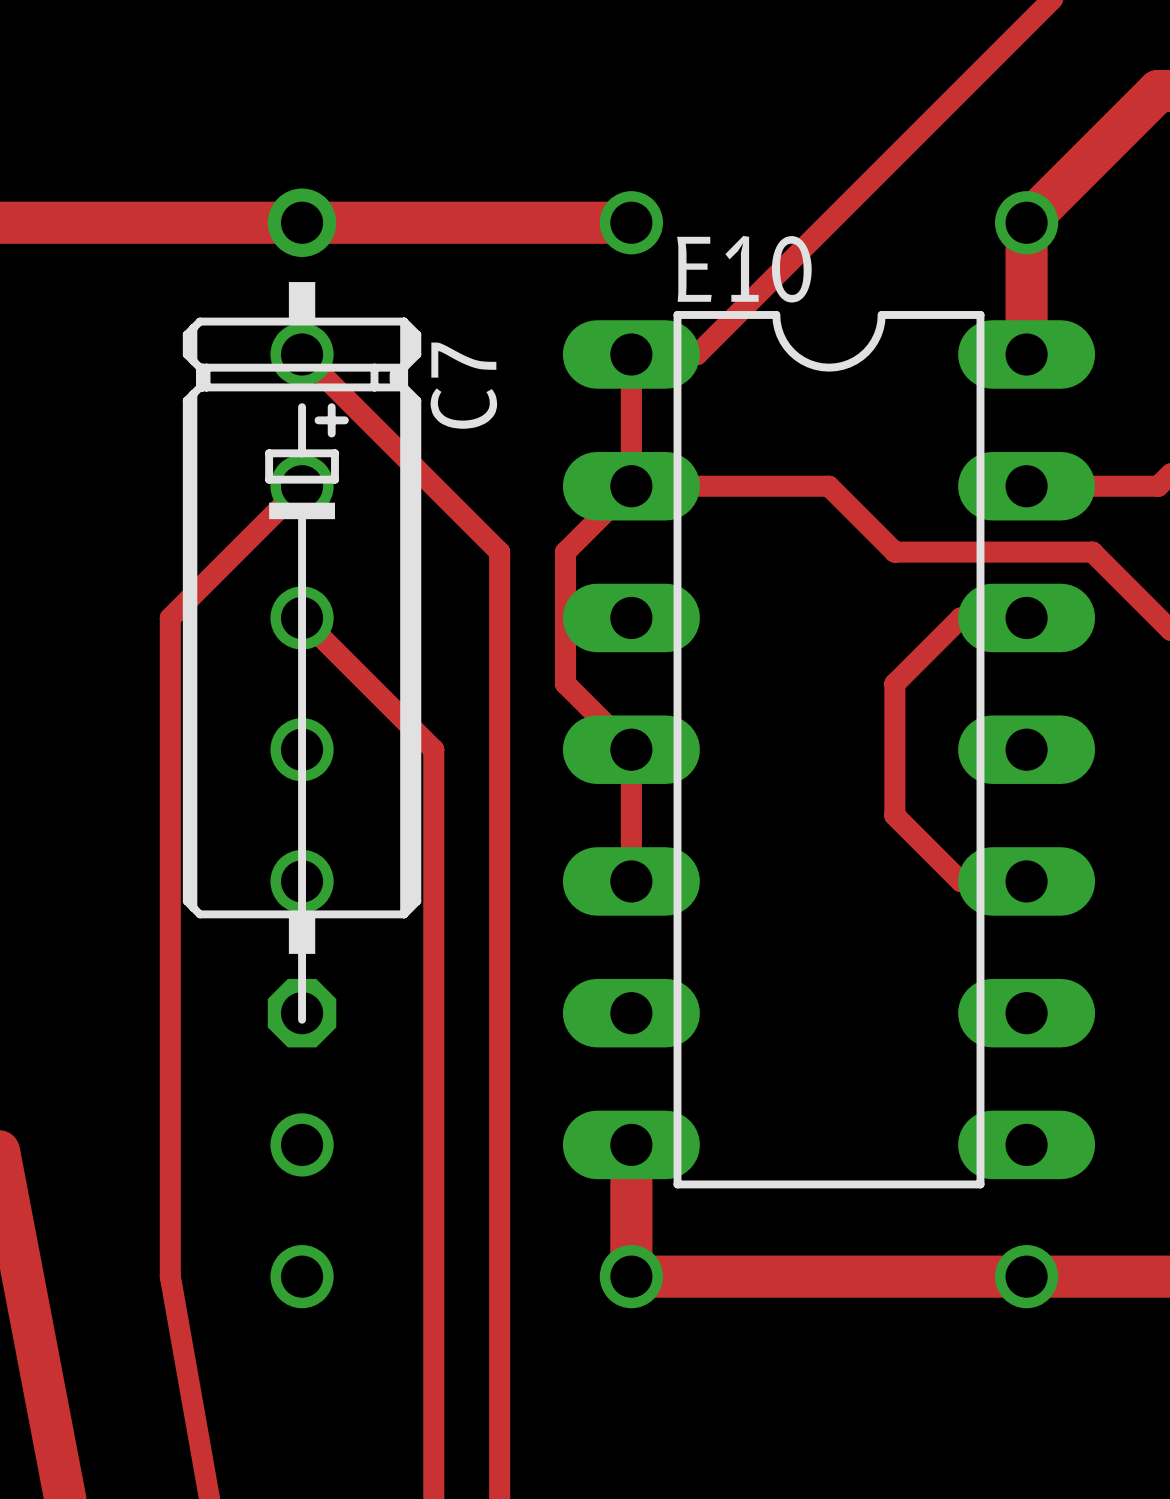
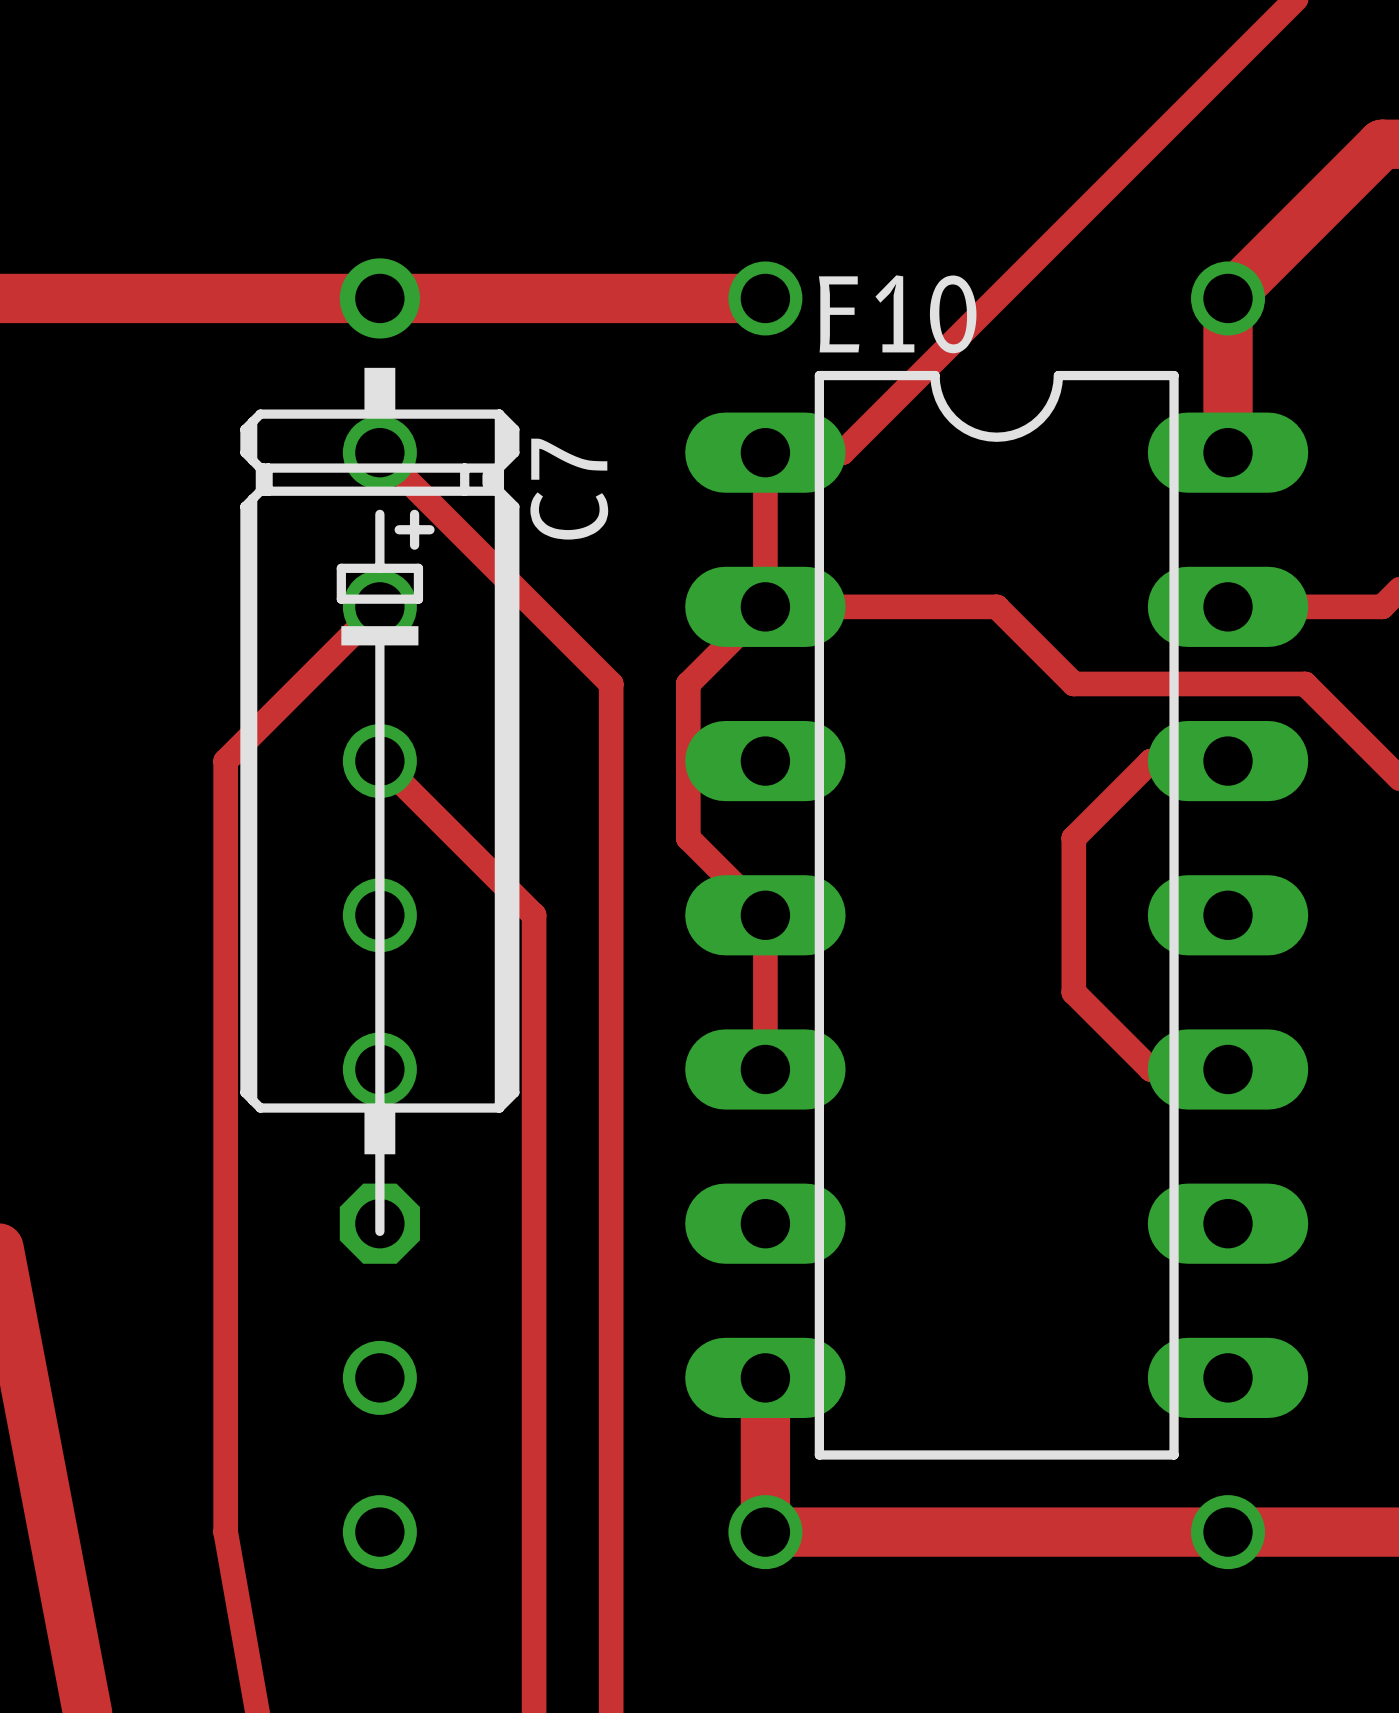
E10 name position: E10 (744, 269) -> E10 (897, 314)
E10 footprint: [562, 311, 1096, 1189] -> [685, 370, 1309, 1460]

